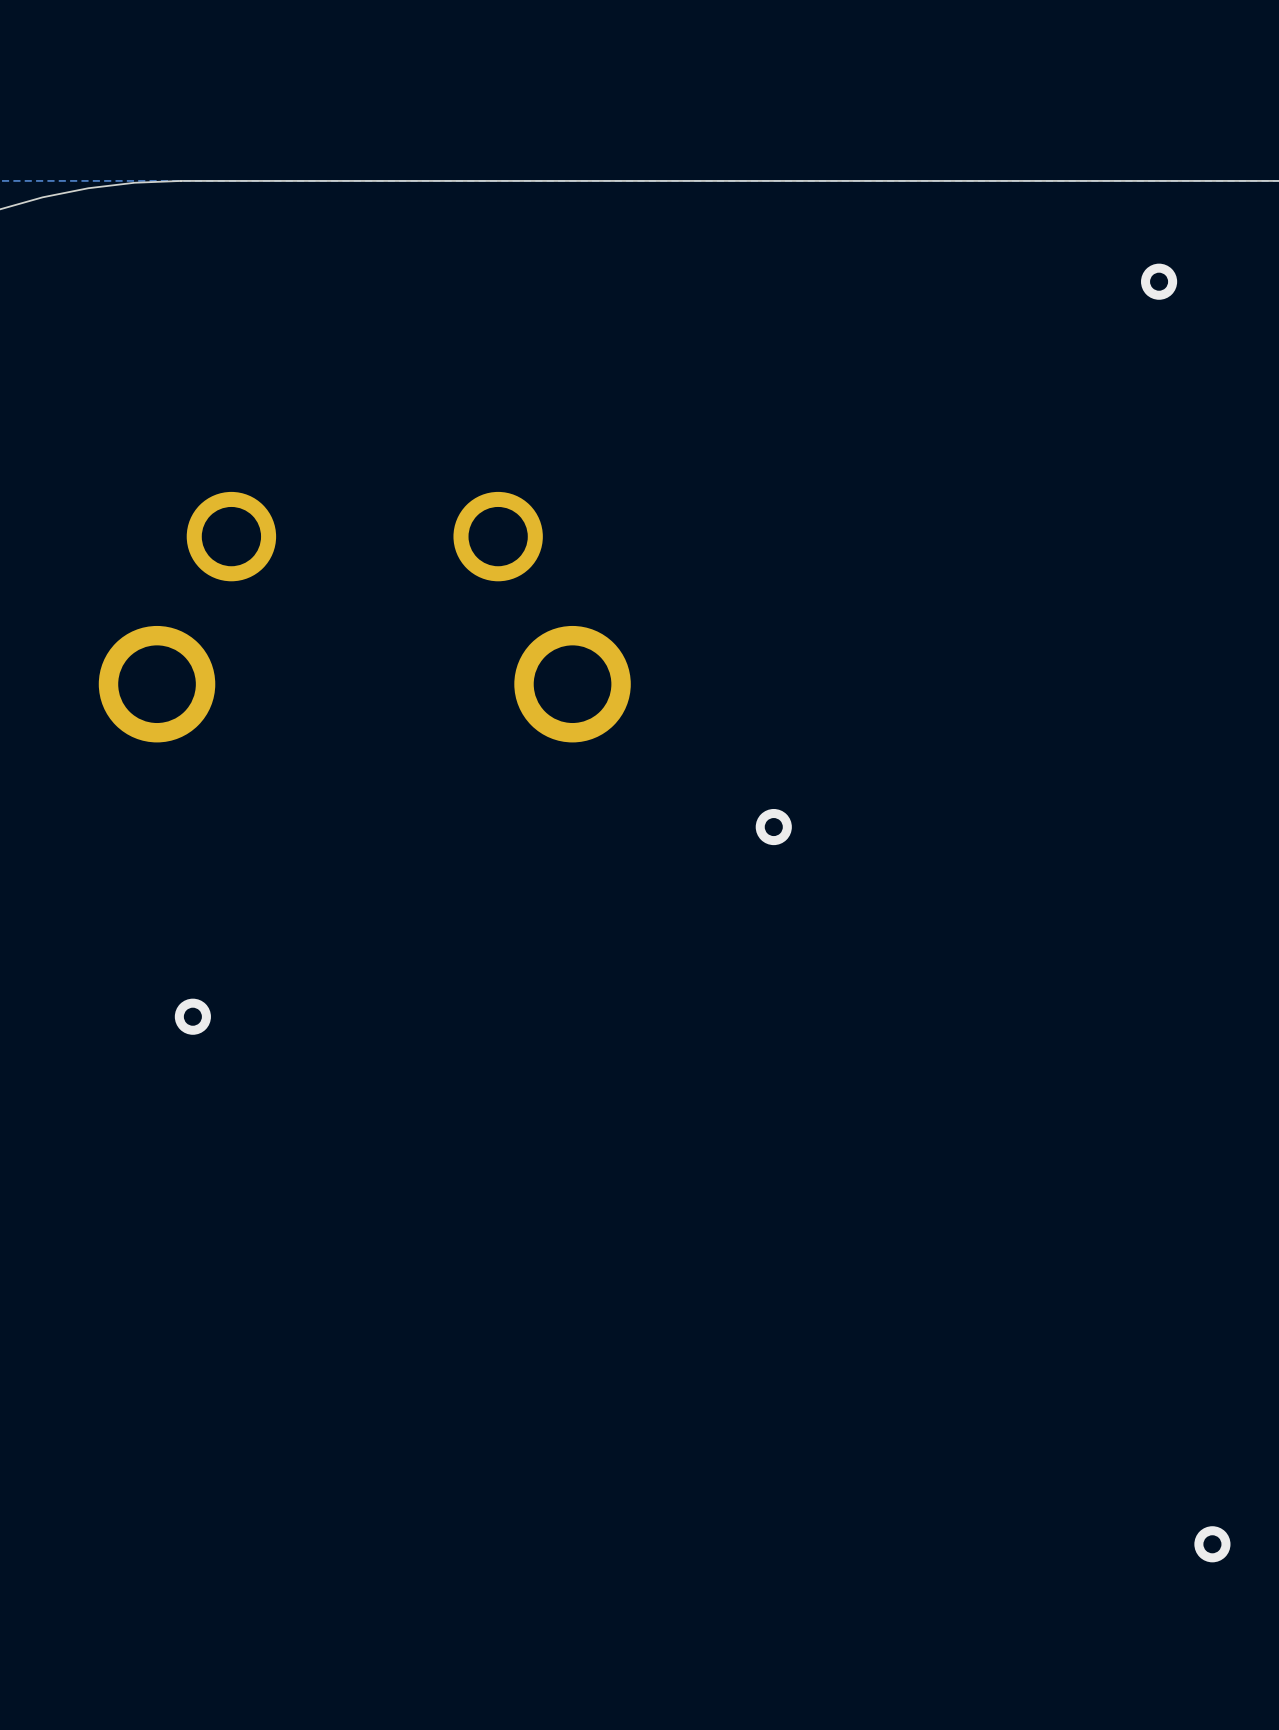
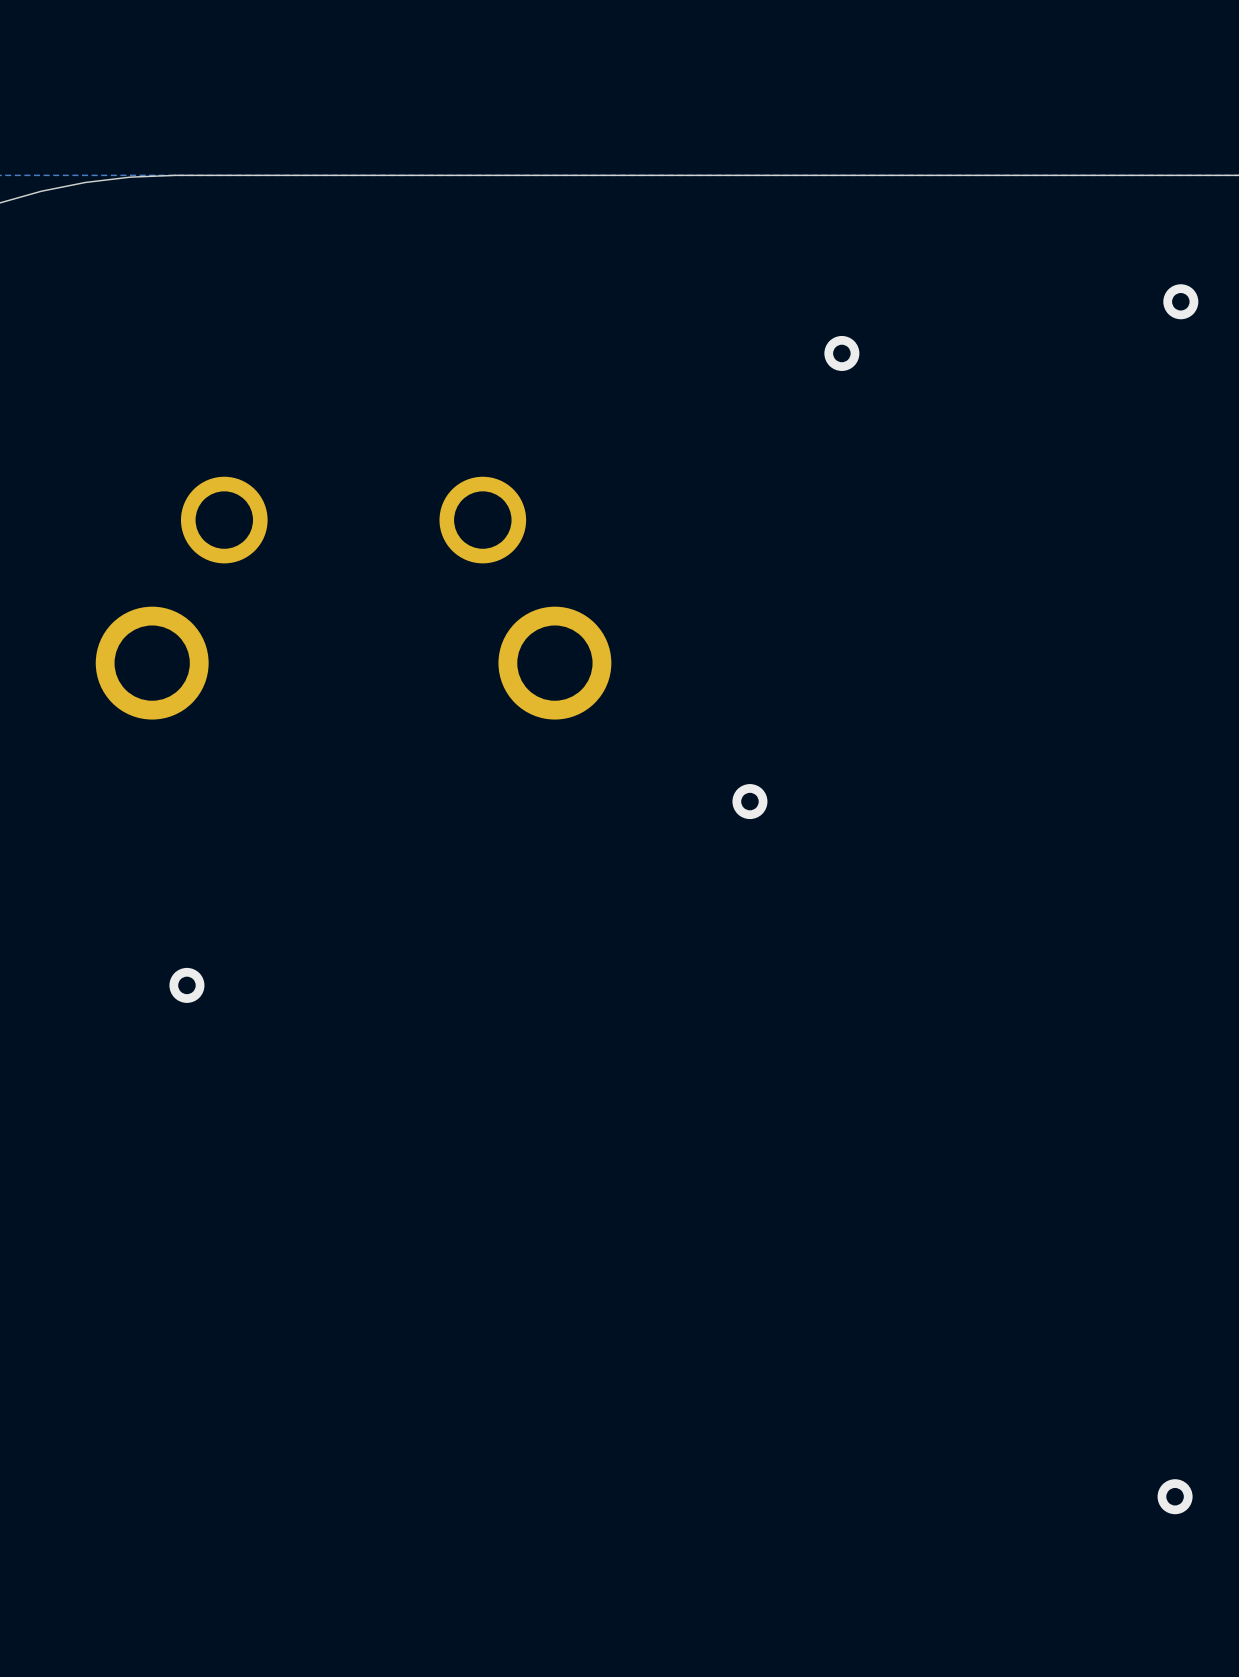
via position: (1159, 281) -> (1180, 301)
via: none -> (841, 353)

